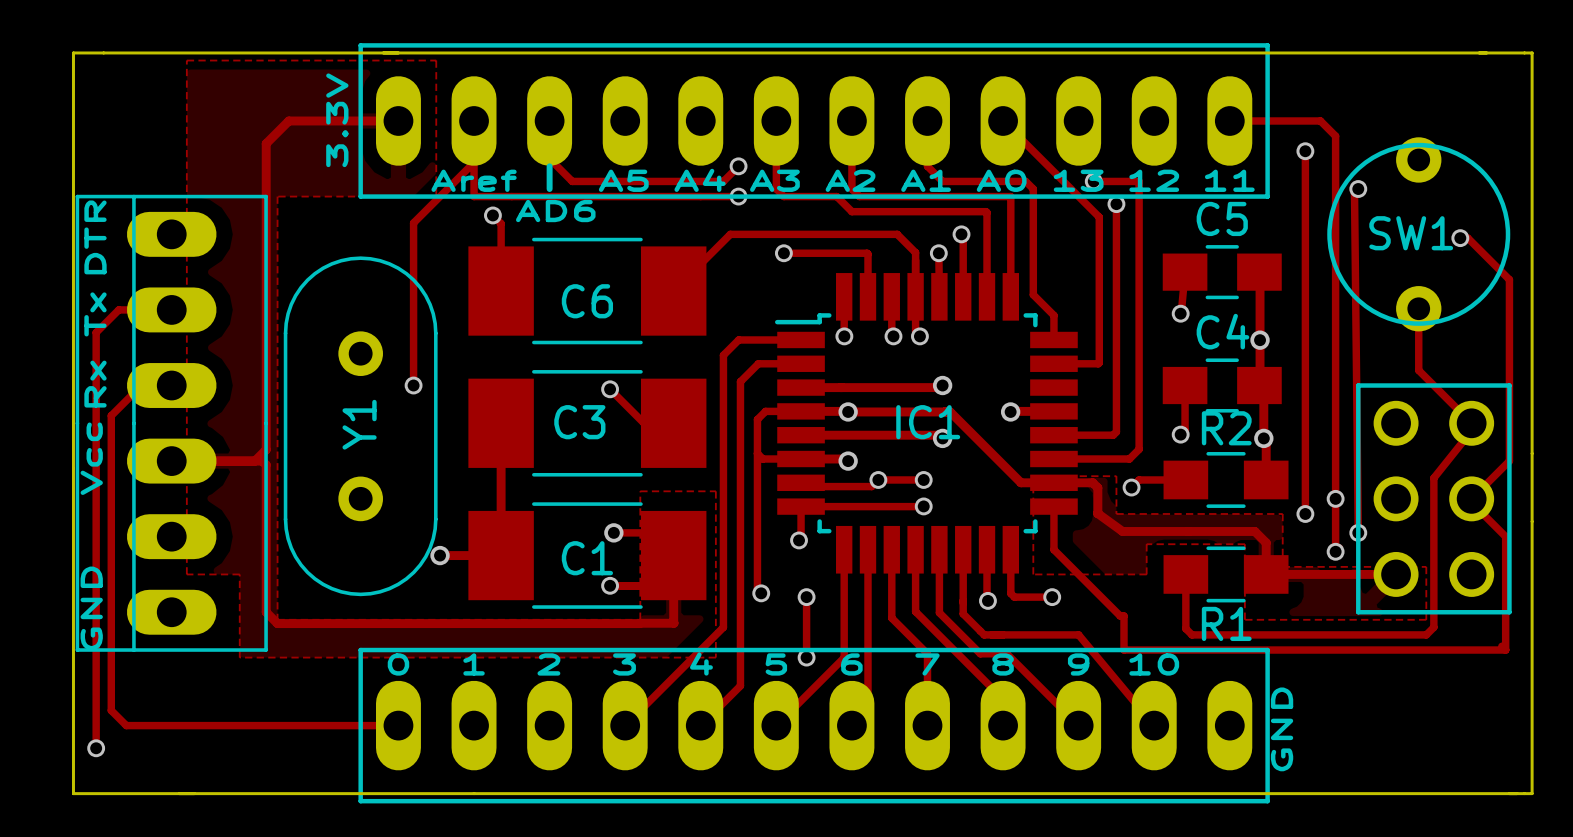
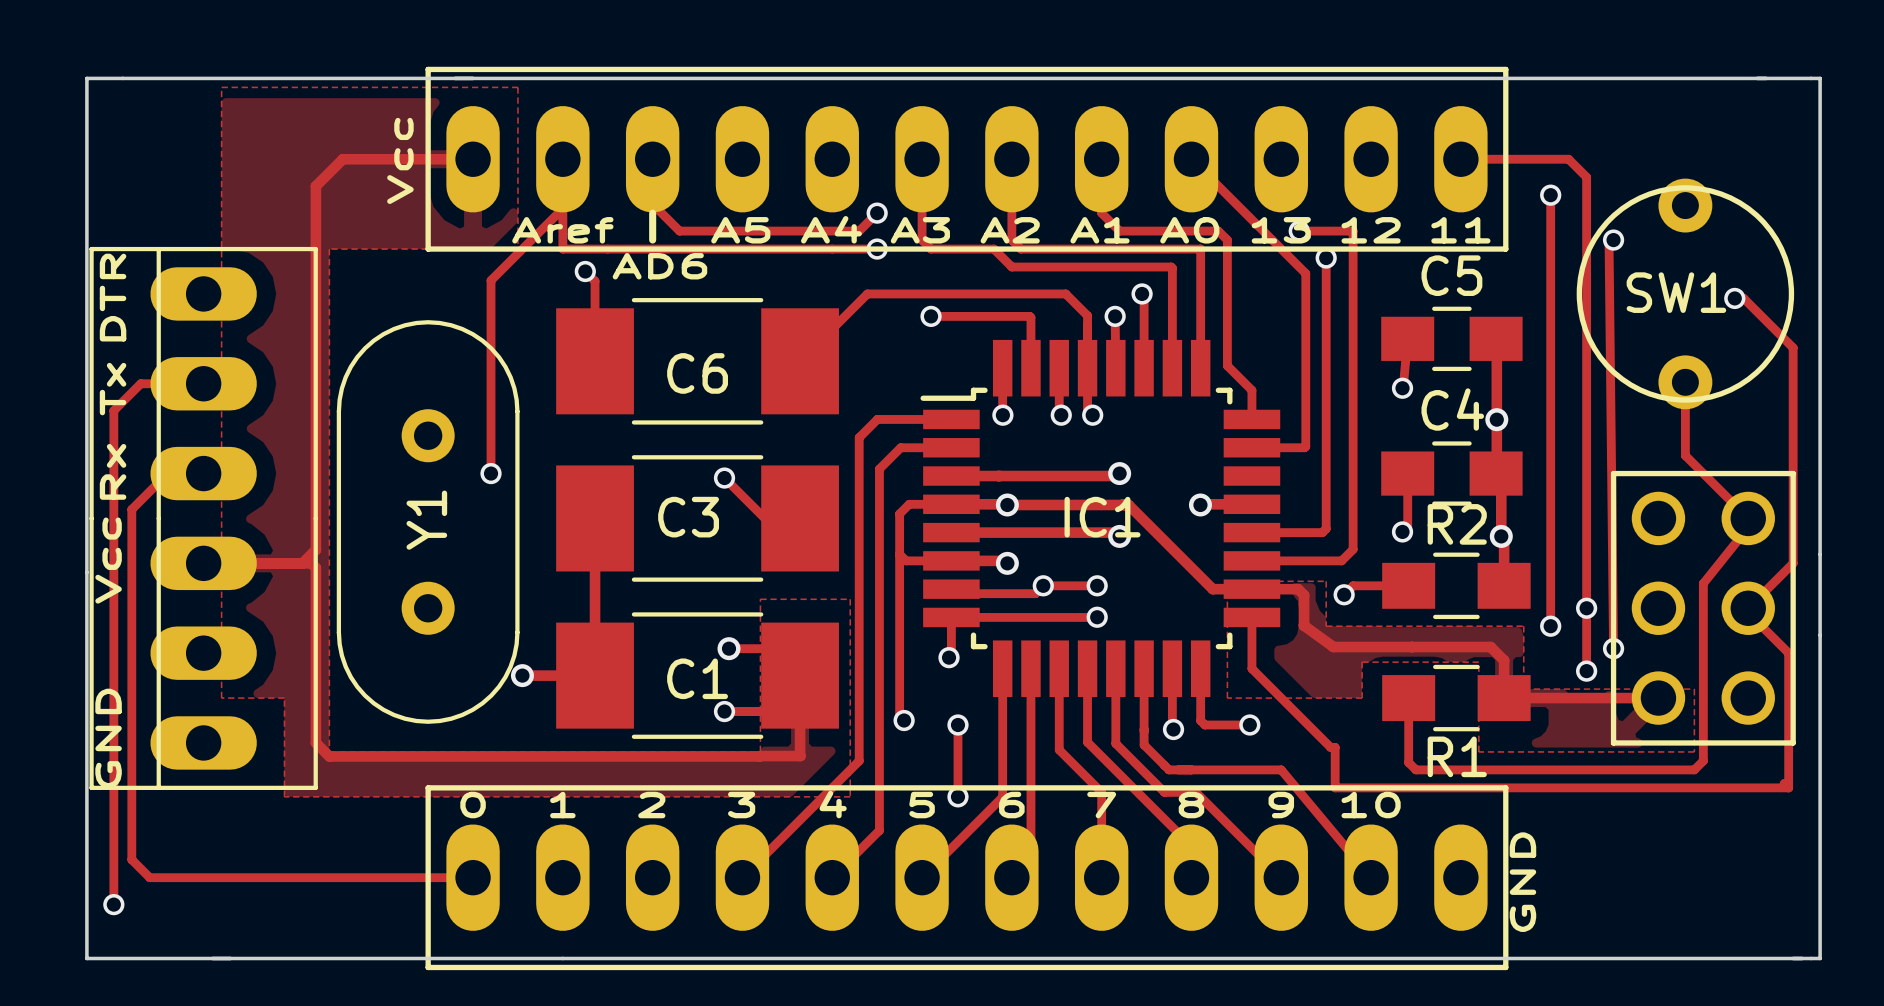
text: 3.3V (337, 120) -> Vcc (400, 160)

